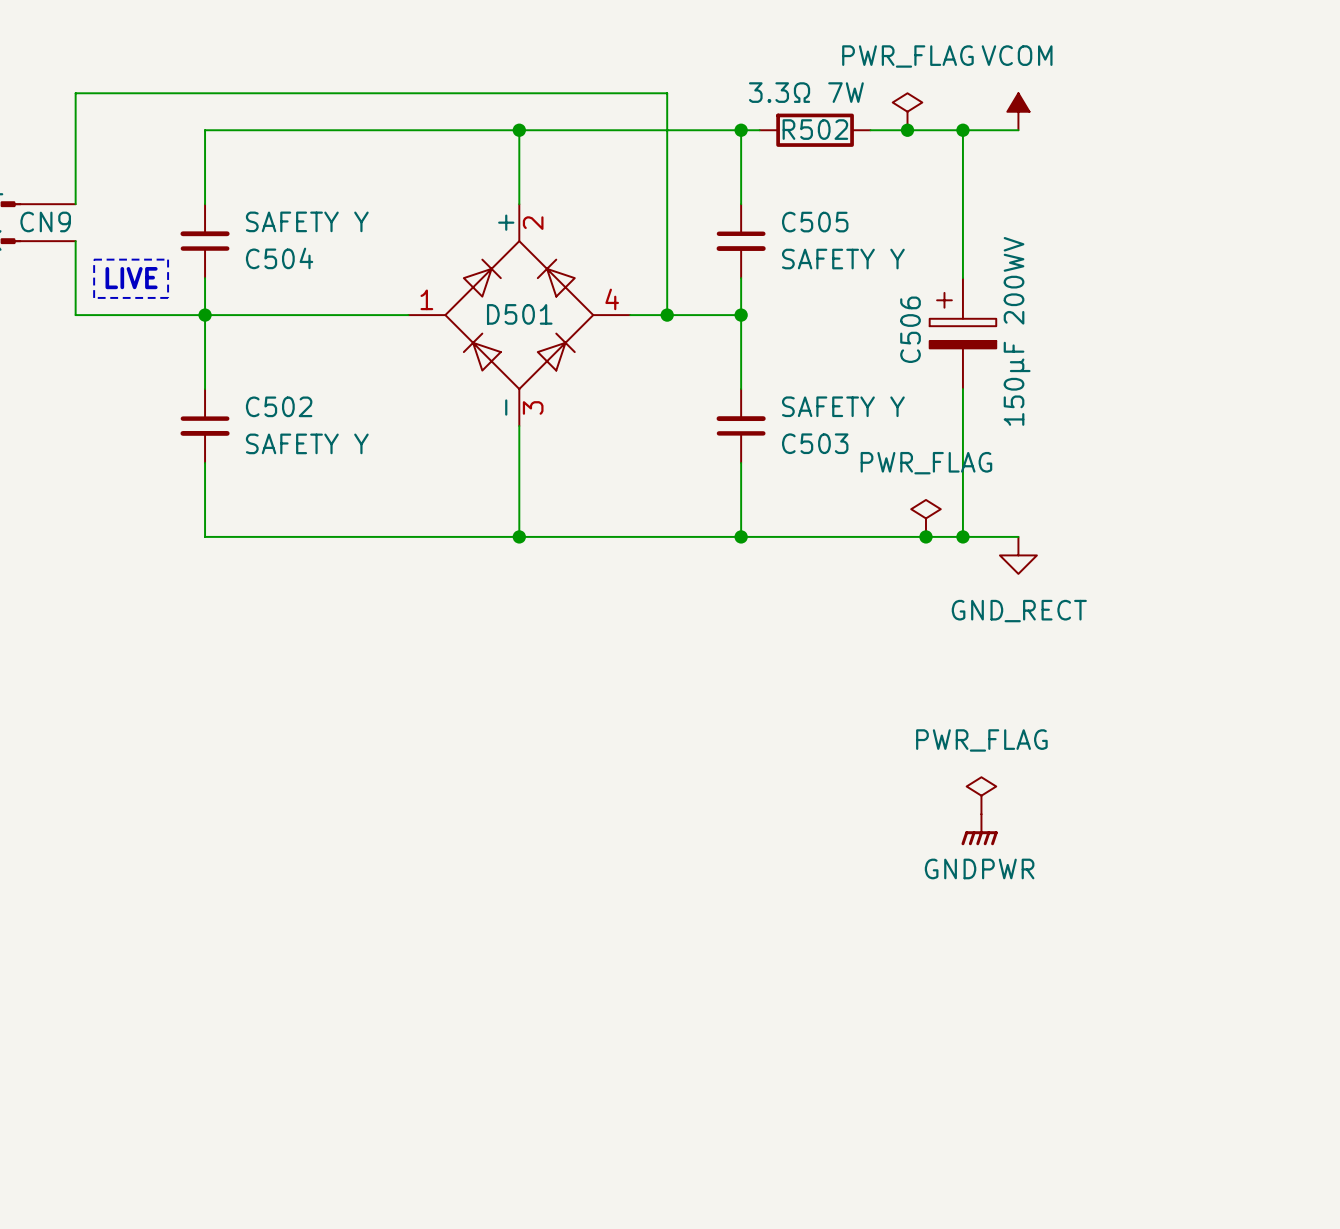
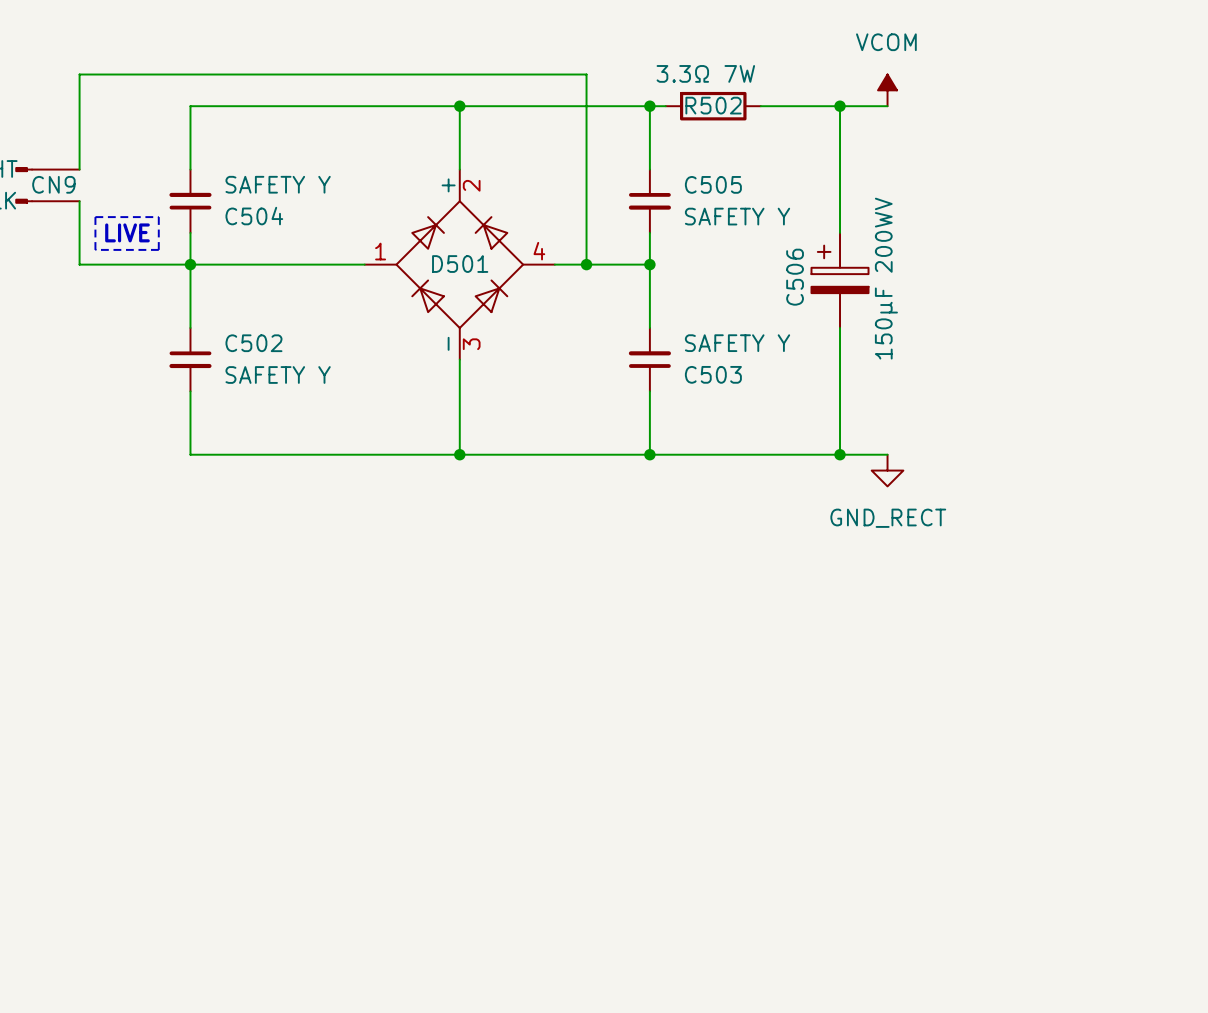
power symbol: PWR_FLAG (907, 111) -> none
junction: (907, 130) -> none
power symbol: PWR_FLAG (925, 518) -> none
junction: (925, 536) -> none
power symbol: PWR_FLAG (981, 795) -> none
power symbol: GNDPWR (979, 829) -> none

